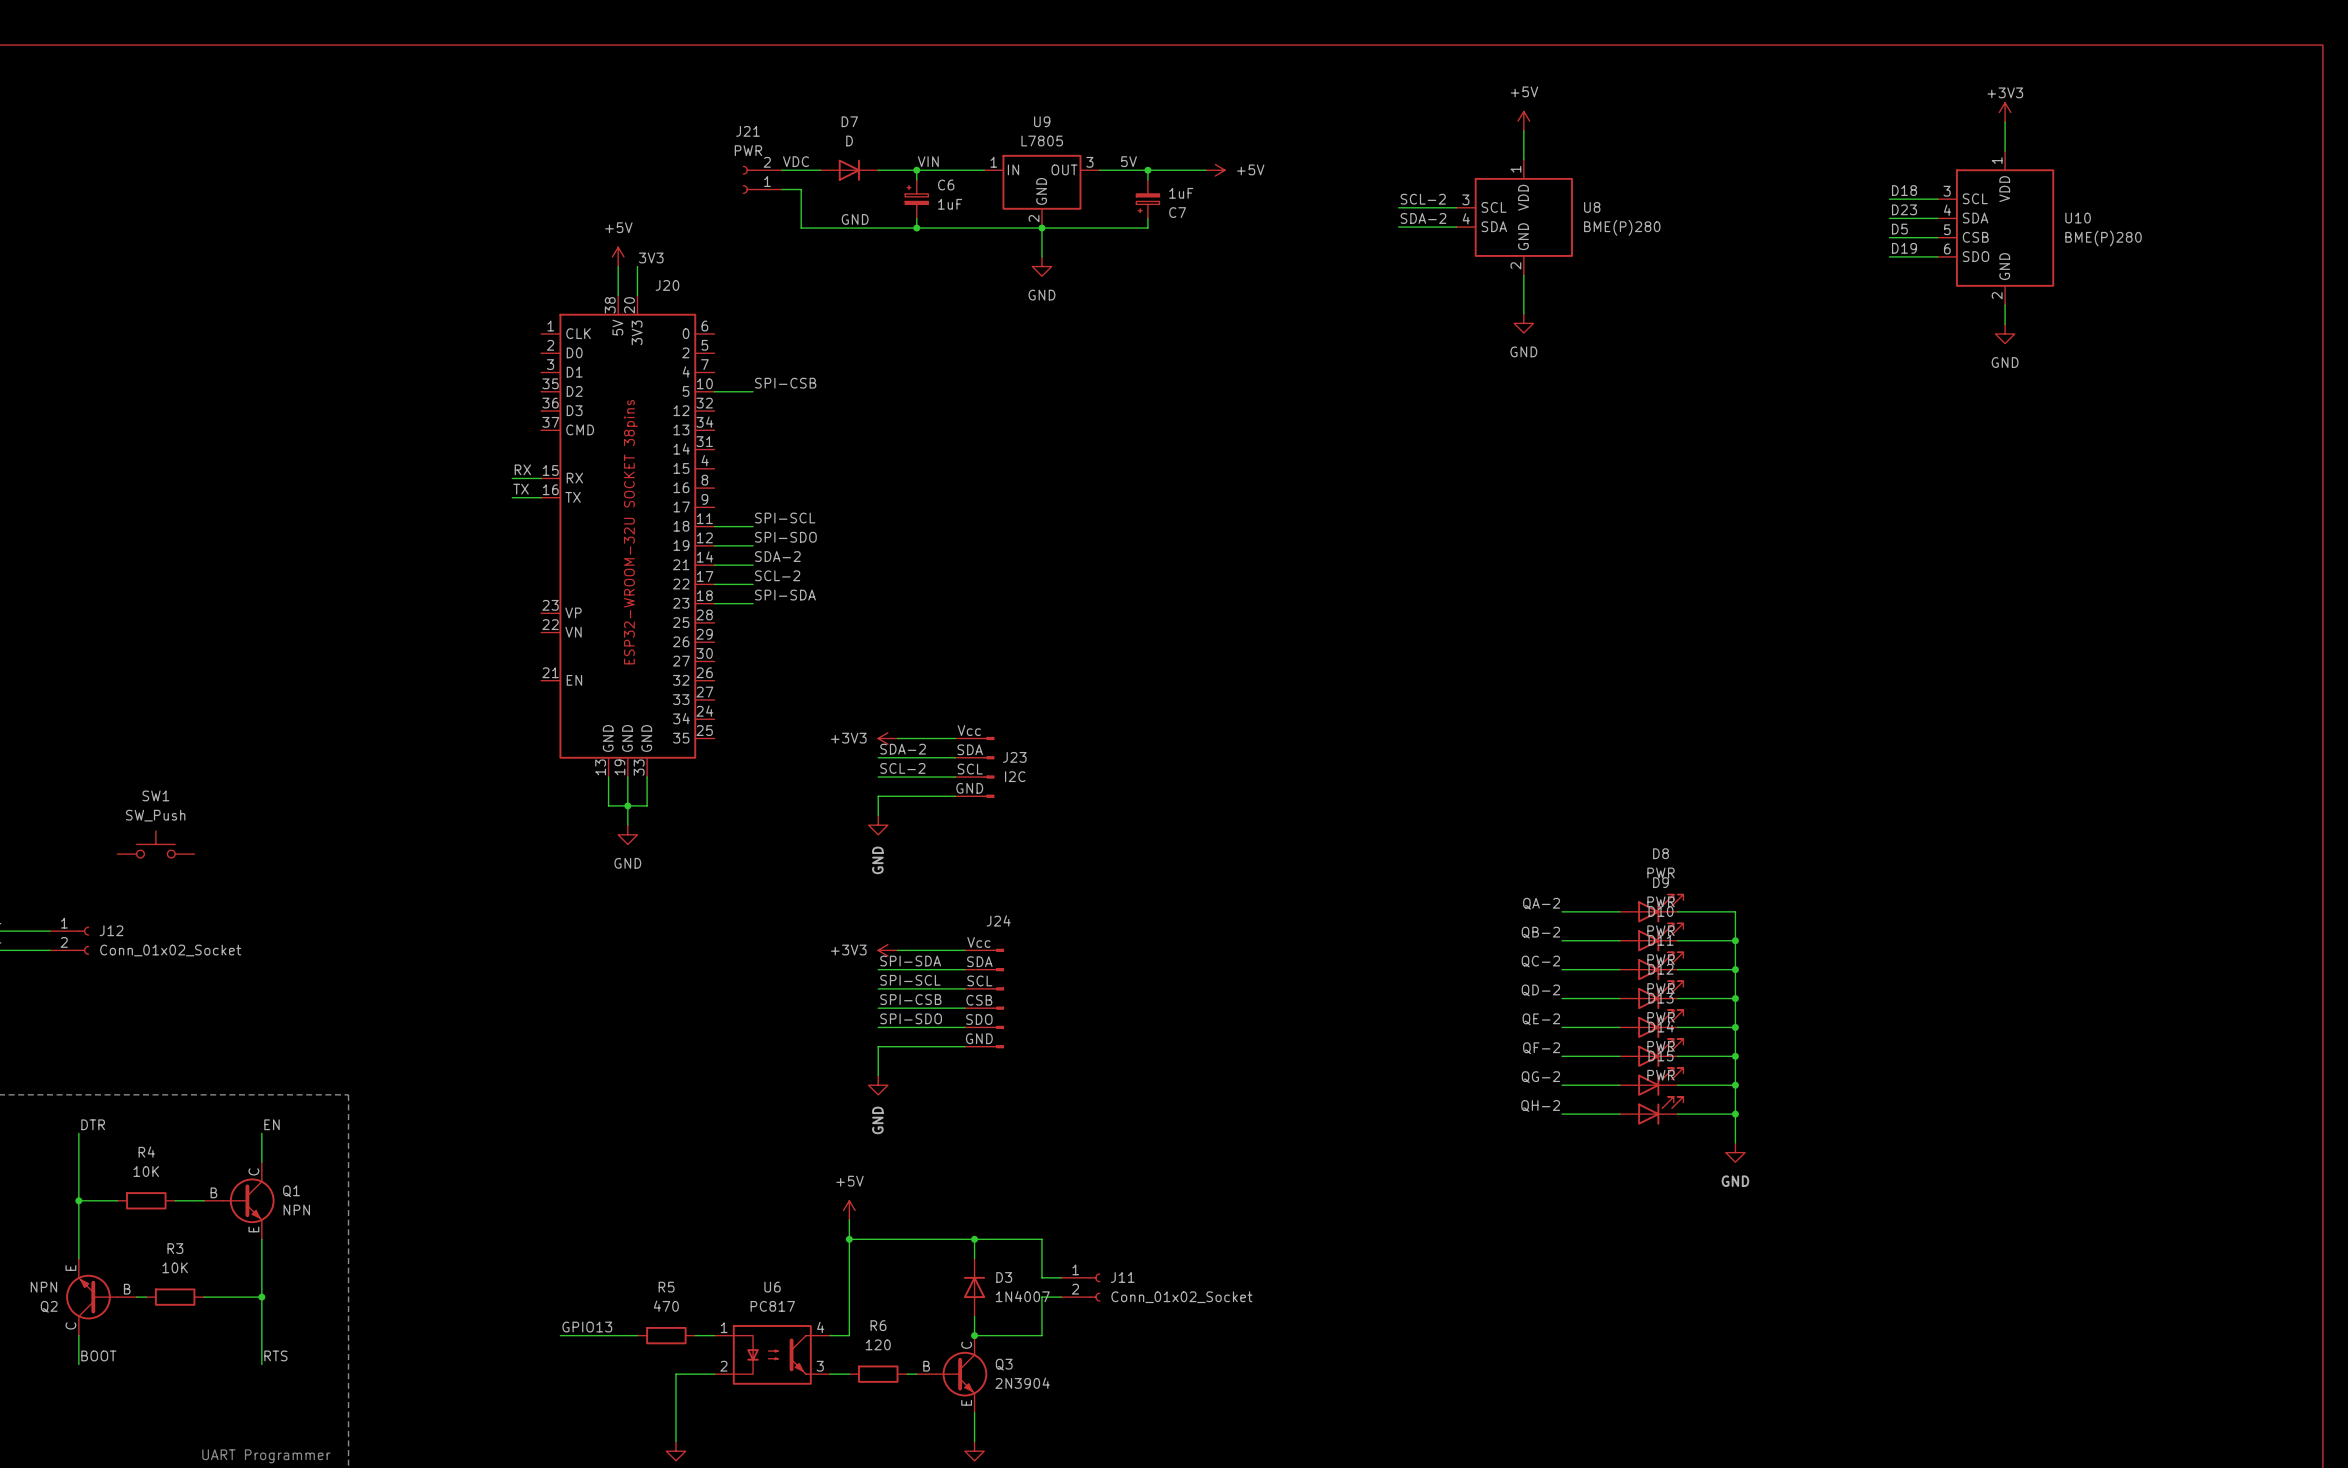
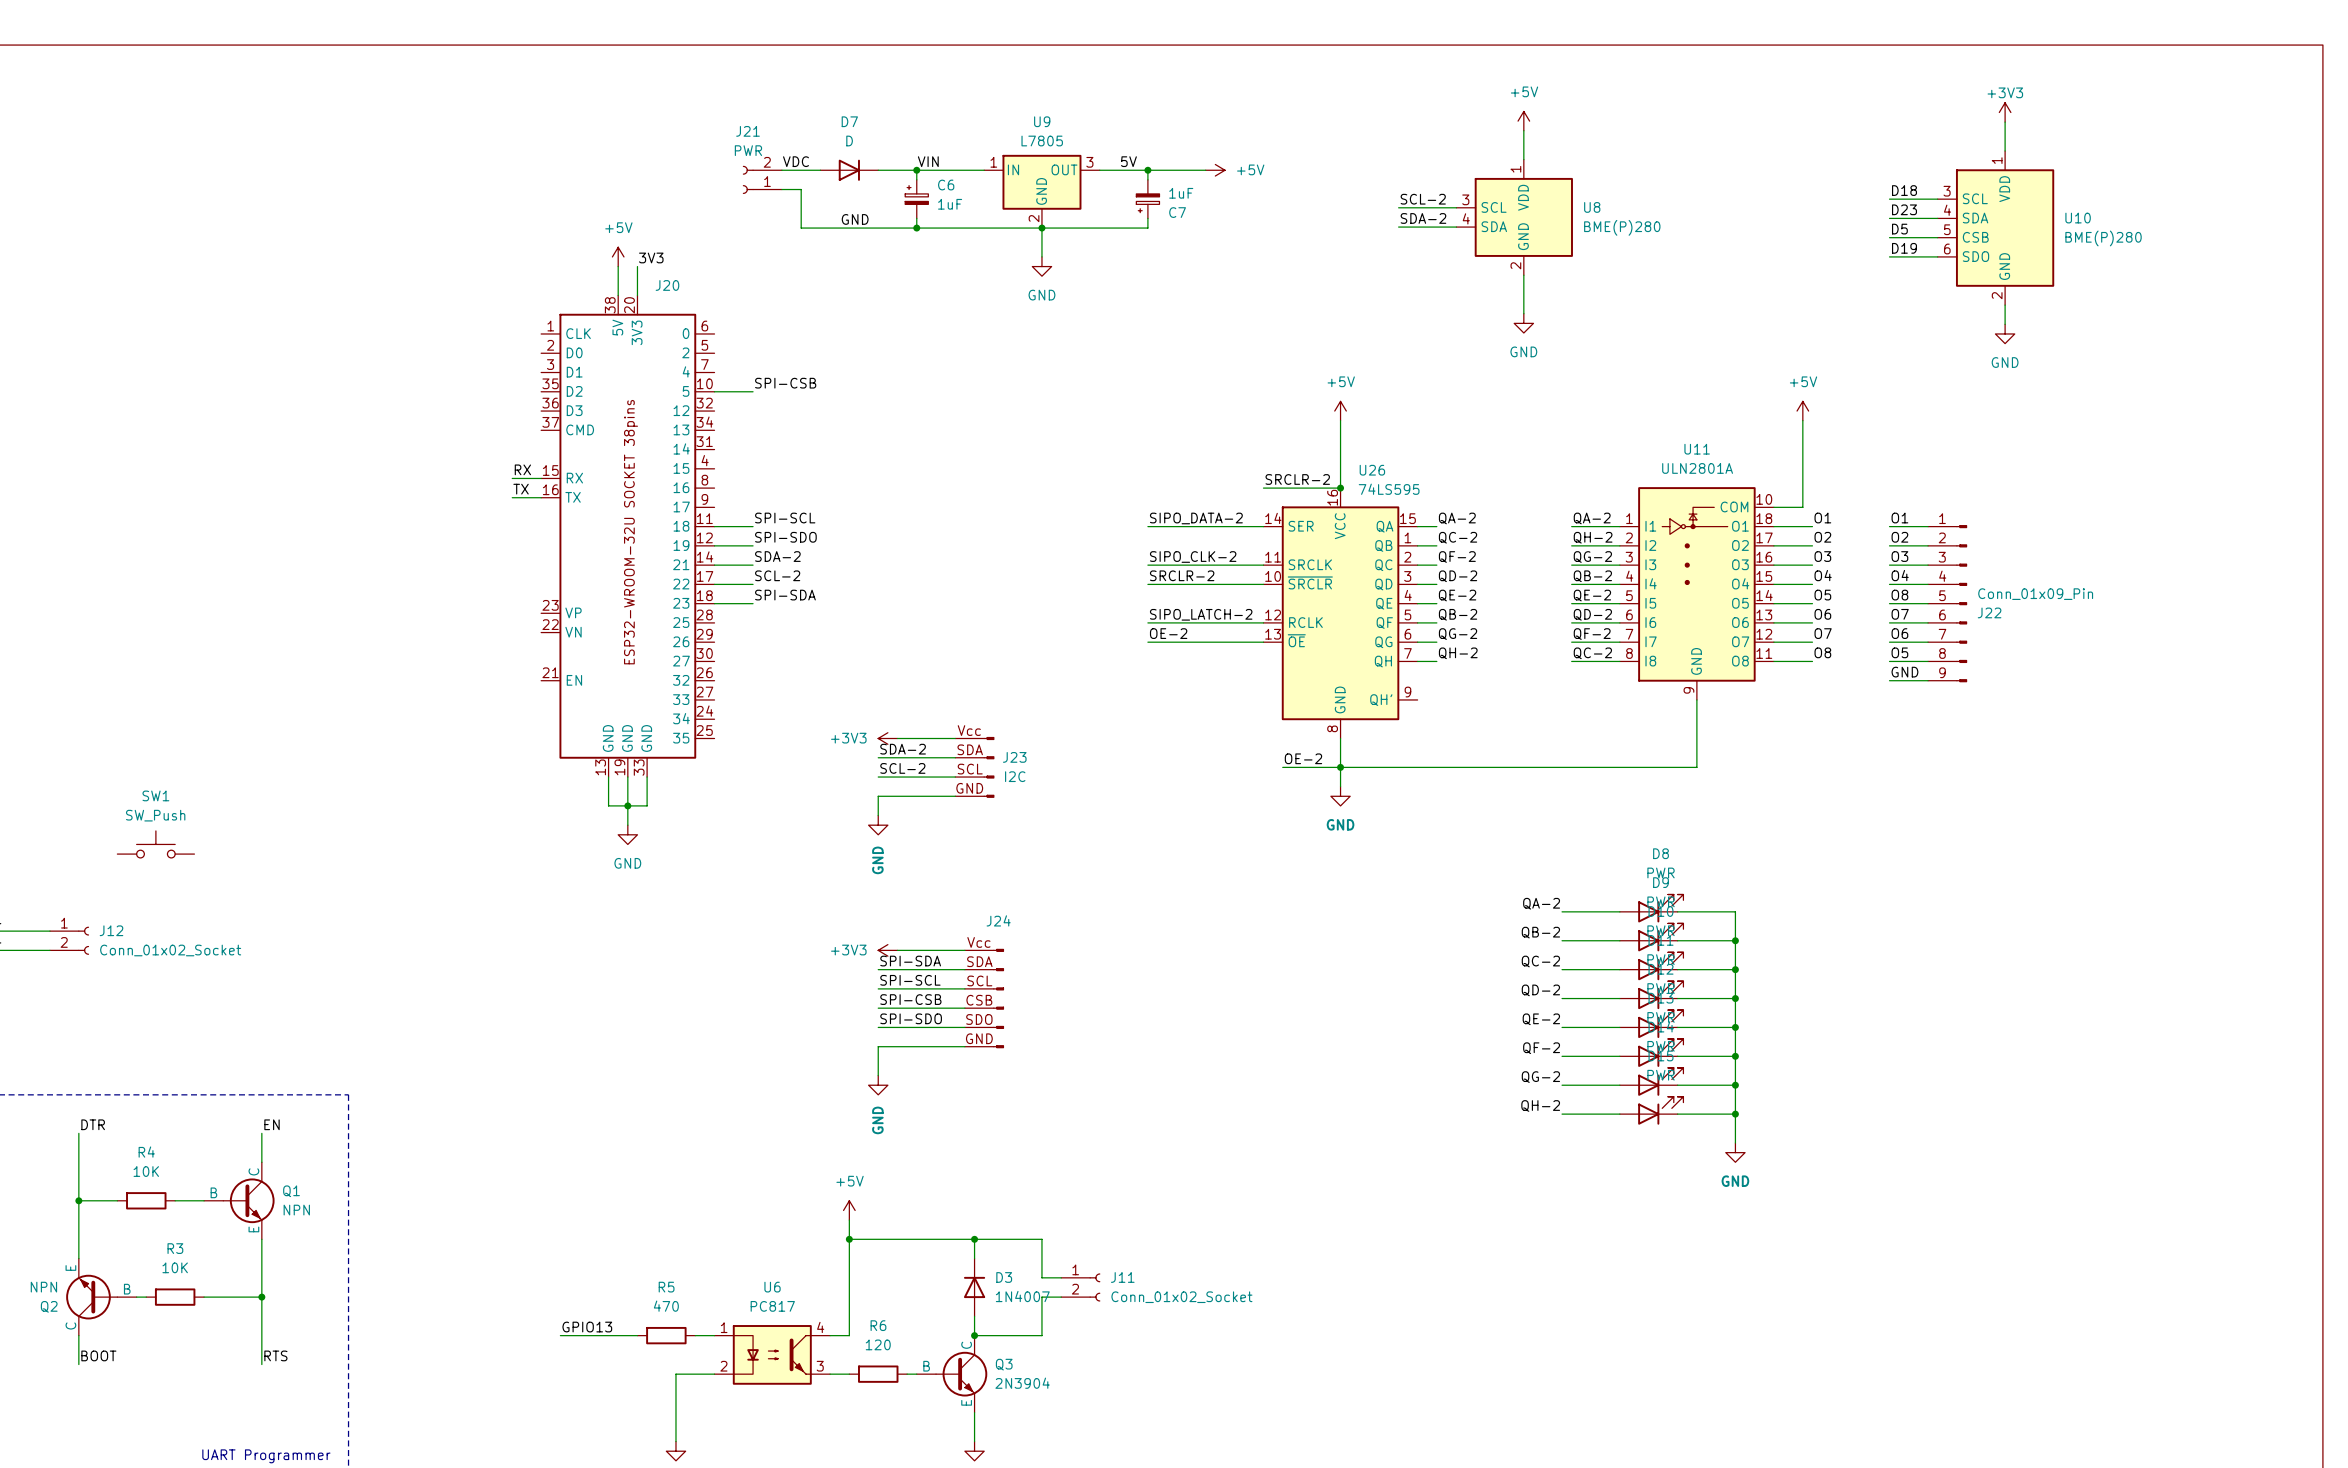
power symbol: none -> +5V (1340, 411)
power symbol: none -> +5V (1802, 411)
wire: none -> (1340, 420) (1340, 488) (1263, 488)
wire: none -> (1802, 420) (1802, 507) (1773, 507)
label: none -> SRCLR-2 (1297, 479)
junction: none -> (1340, 488)
label: none -> SIPO_DATA-2 (1196, 518)
label: none -> QA-2 (1457, 518)
label: none -> QA-2 (1592, 518)
label: none -> O1 (1822, 518)
label: none -> O1 (1899, 518)
wire: none -> (1147, 526) (1263, 526)
wire: none -> (1417, 526) (1436, 526)
wire: none -> (1571, 526) (1619, 526)
wire: none -> (1773, 526) (1812, 526)
wire: none -> (1889, 526) (1928, 526)
label: none -> QC-2 (1458, 537)
label: none -> QH-2 (1593, 537)
label: none -> O2 (1822, 537)
label: none -> O2 (1899, 537)
wire: none -> (1417, 545) (1436, 545)
wire: none -> (1571, 545) (1619, 545)
wire: none -> (1773, 545) (1812, 545)
wire: none -> (1889, 545) (1928, 545)
label: none -> O3 (1822, 556)
label: none -> O3 (1899, 556)
label: none -> SIPO_CLK-2 (1193, 557)
label: none -> QF-2 (1457, 557)
label: none -> QG-2 (1592, 557)
wire: none -> (1147, 565) (1263, 565)
wire: none -> (1417, 565) (1436, 565)
wire: none -> (1571, 565) (1619, 565)
wire: none -> (1773, 565) (1812, 565)
wire: none -> (1889, 565) (1928, 565)
label: none -> SRCLR-2 (1182, 575)
label: none -> O4 (1823, 575)
label: none -> O4 (1900, 575)
label: none -> QD-2 (1458, 576)
label: none -> QB-2 (1592, 576)
wire: none -> (1147, 584) (1263, 584)
wire: none -> (1417, 584) (1436, 584)
wire: none -> (1571, 584) (1619, 584)
wire: none -> (1773, 584) (1812, 584)
wire: none -> (1889, 584) (1928, 584)
U11: none -> ULN2801A (1696, 593)
label: none -> QE-2 (1457, 595)
label: none -> QE-2 (1592, 595)
label: none -> O5 (1822, 595)
label: none -> O8 (1899, 595)
wire: none -> (1417, 603) (1436, 603)
wire: none -> (1571, 603) (1619, 603)
wire: none -> (1773, 603) (1812, 603)
wire: none -> (1889, 603) (1928, 603)
J22: none -> Conn_01x09_Pin (1947, 603)
U26: none -> 74LS595 (1340, 613)
label: none -> SIPO_LATCH-2 (1201, 614)
label: none -> QB-2 (1458, 614)
label: none -> QD-2 (1592, 614)
label: none -> O6 (1822, 614)
label: none -> O7 (1900, 614)
wire: none -> (1147, 622) (1263, 622)
wire: none -> (1417, 622) (1436, 622)
wire: none -> (1571, 622) (1619, 622)
wire: none -> (1773, 622) (1812, 622)
wire: none -> (1889, 622) (1928, 622)
label: none -> OE-2 (1168, 633)
label: none -> O7 (1823, 633)
label: none -> O6 (1899, 633)
label: none -> QG-2 (1458, 634)
label: none -> QF-2 (1592, 634)
wire: none -> (1147, 642) (1263, 642)
wire: none -> (1417, 642) (1436, 642)
wire: none -> (1571, 642) (1619, 642)
wire: none -> (1773, 642) (1812, 642)
wire: none -> (1889, 642) (1928, 642)
label: none -> O8 (1822, 652)
label: none -> O5 (1899, 652)
label: none -> QH-2 (1458, 653)
label: none -> QC-2 (1592, 653)
wire: none -> (1417, 661) (1436, 661)
wire: none -> (1571, 661) (1619, 661)
wire: none -> (1773, 661) (1812, 661)
wire: none -> (1889, 661) (1928, 661)
label: none -> GND (1904, 672)
wire: none -> (1889, 680) (1928, 680)
wire: none -> (1696, 699) (1696, 767) (1282, 767)
wire: none -> (1340, 738) (1340, 786)
label: none -> OE-2 (1303, 758)
junction: none -> (1340, 767)
power symbol: none -> GND (1340, 796)

